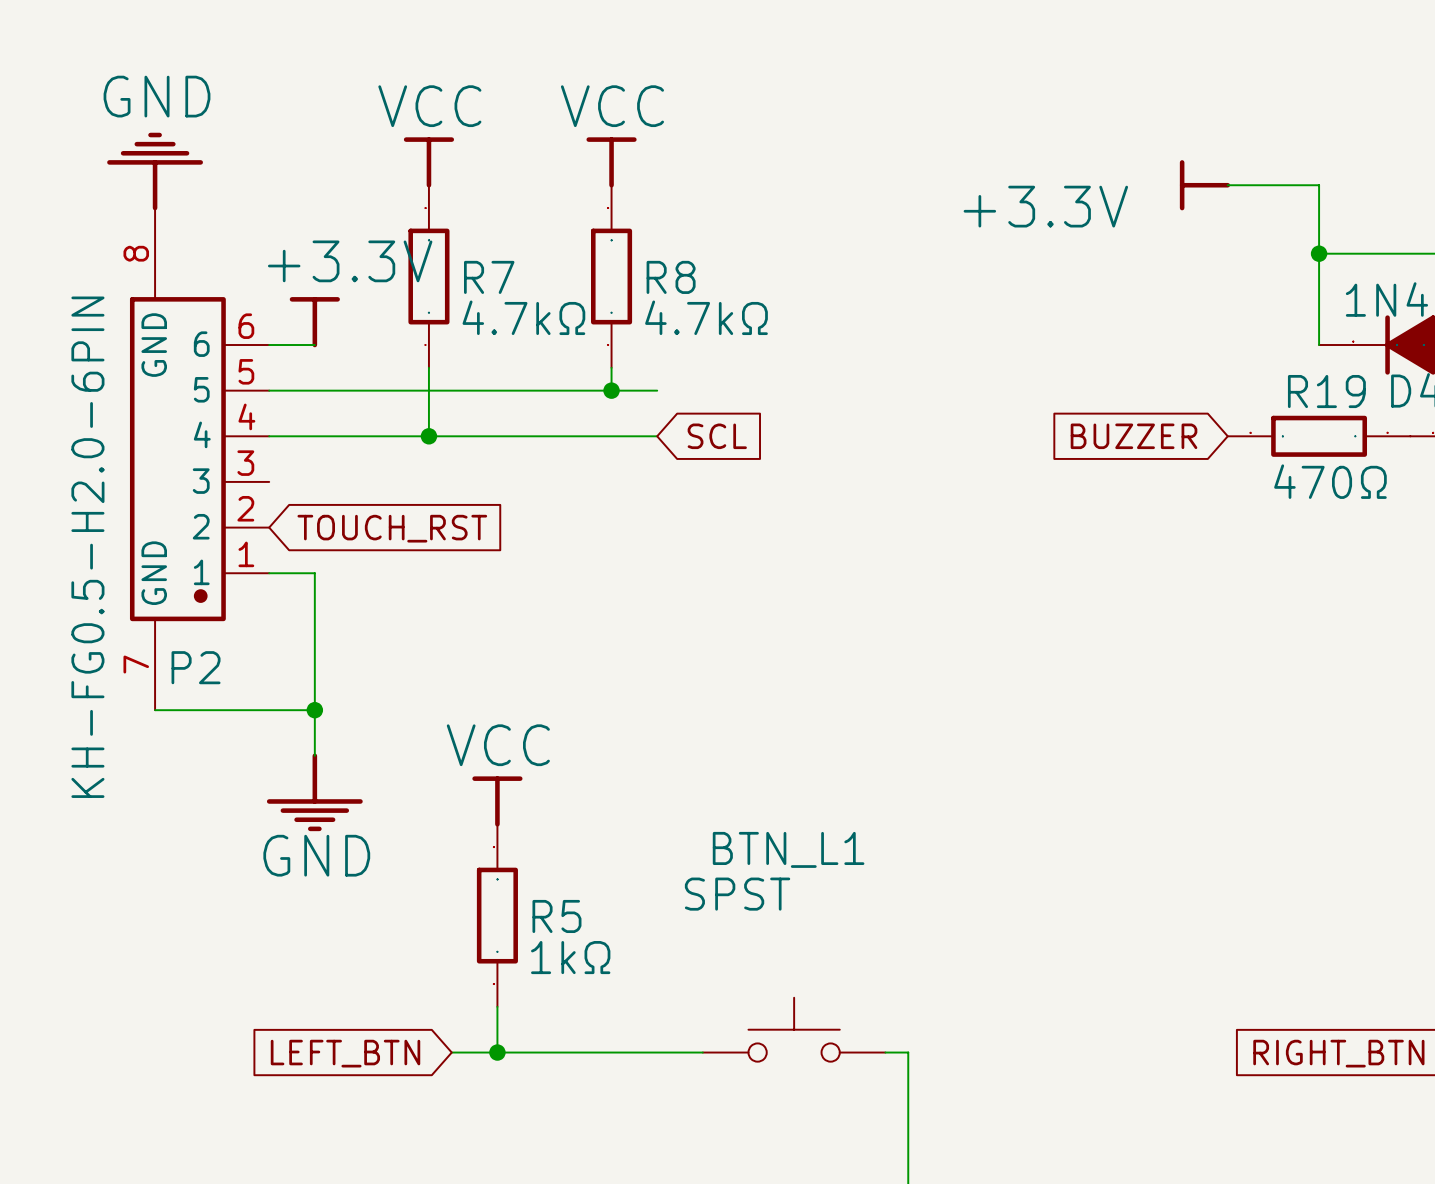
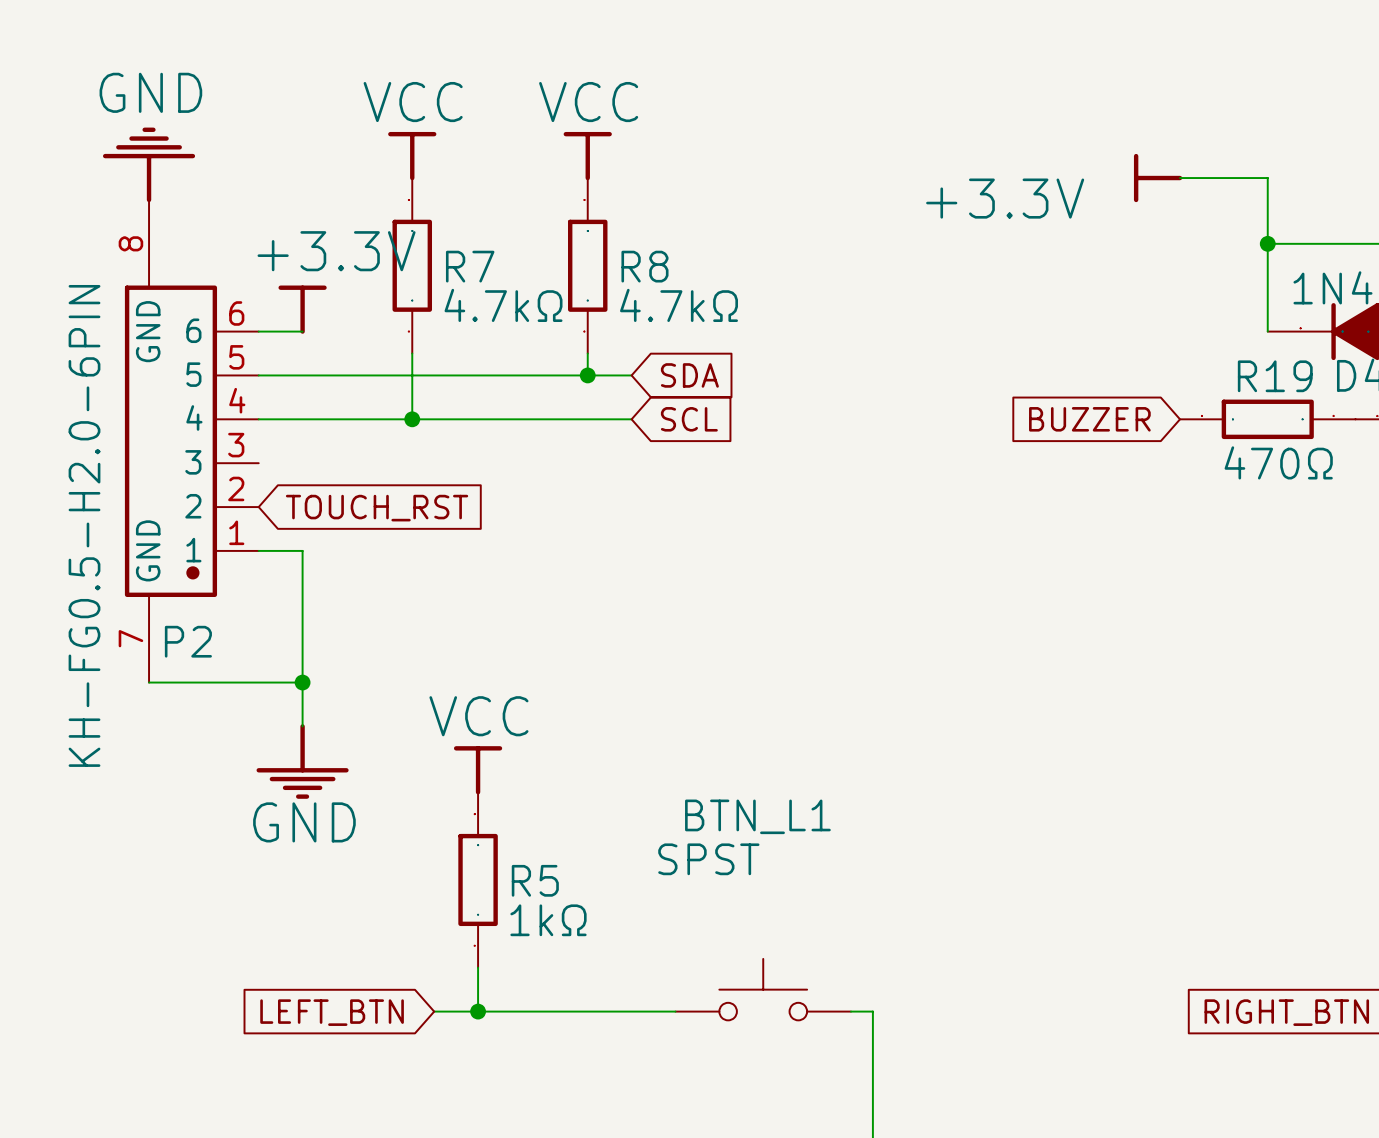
global label: none -> SDA (689, 375)

